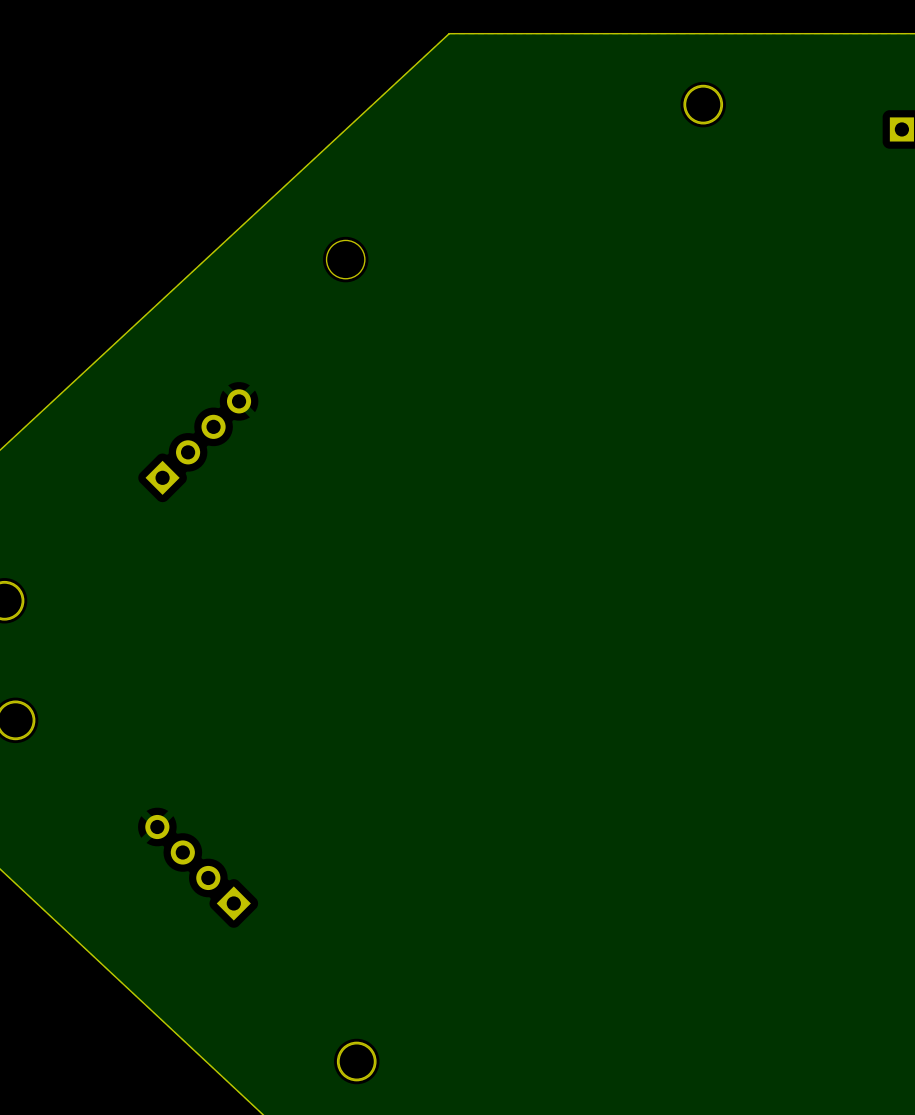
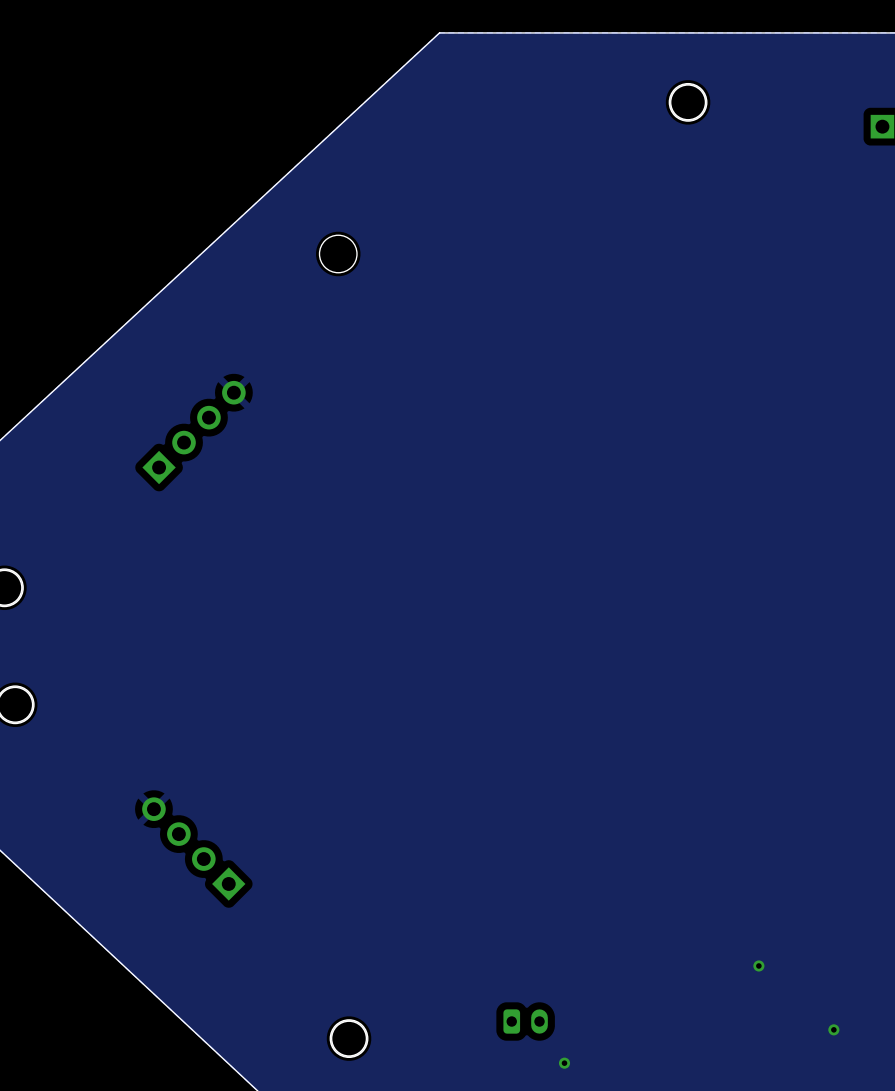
via: none -> (758, 965)
part: none -> (525, 1021)
via: none -> (833, 1029)
via: none -> (564, 1063)

